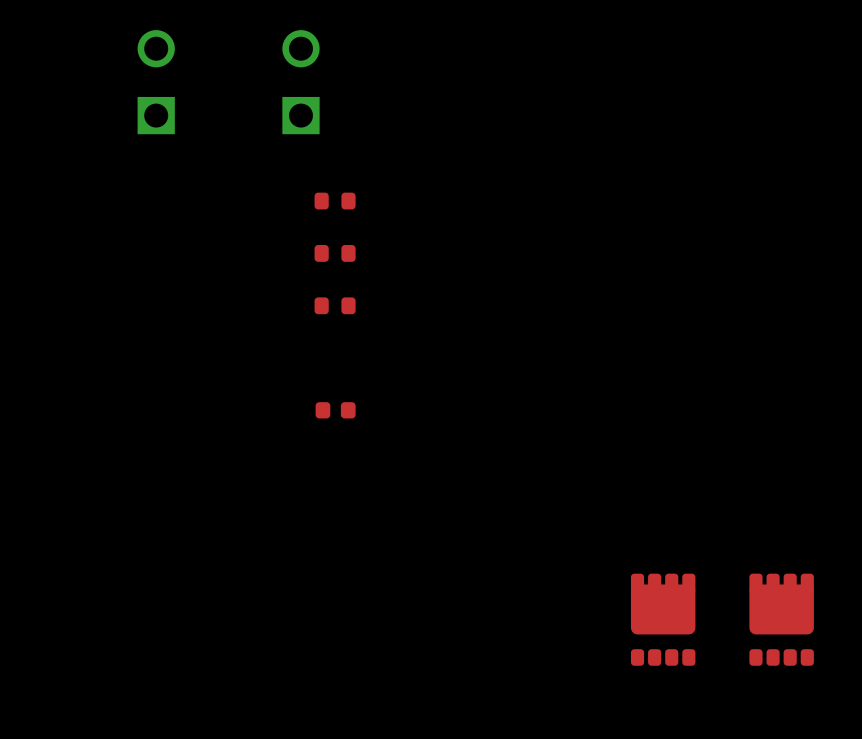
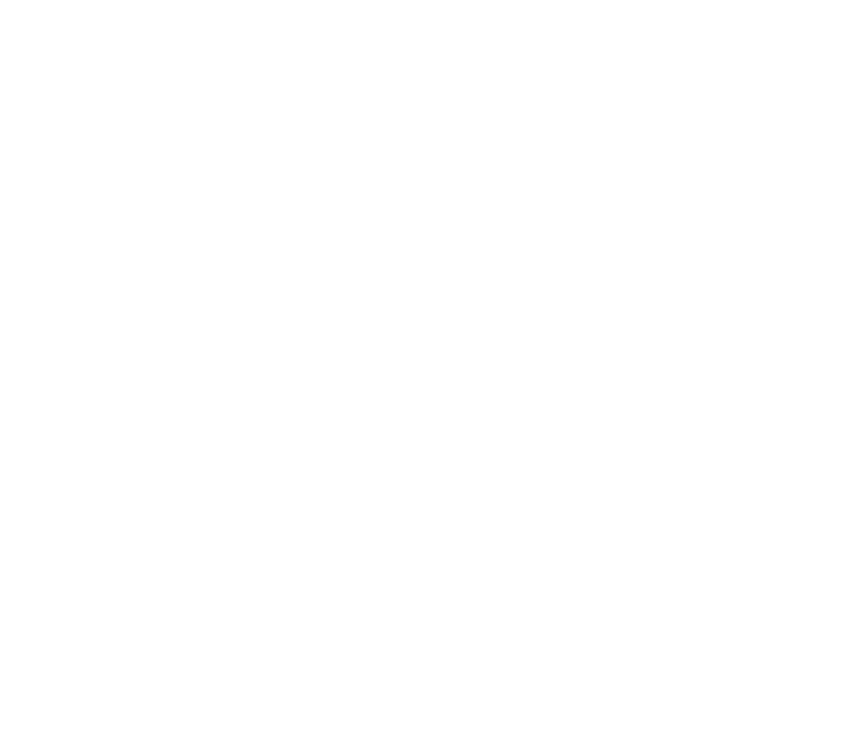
part: (156, 82) -> none
part: (300, 82) -> none
part: (335, 201) -> none
part: (335, 253) -> none
part: (335, 305) -> none
part: (335, 410) -> none
part: (663, 619) -> none
part: (781, 619) -> none

